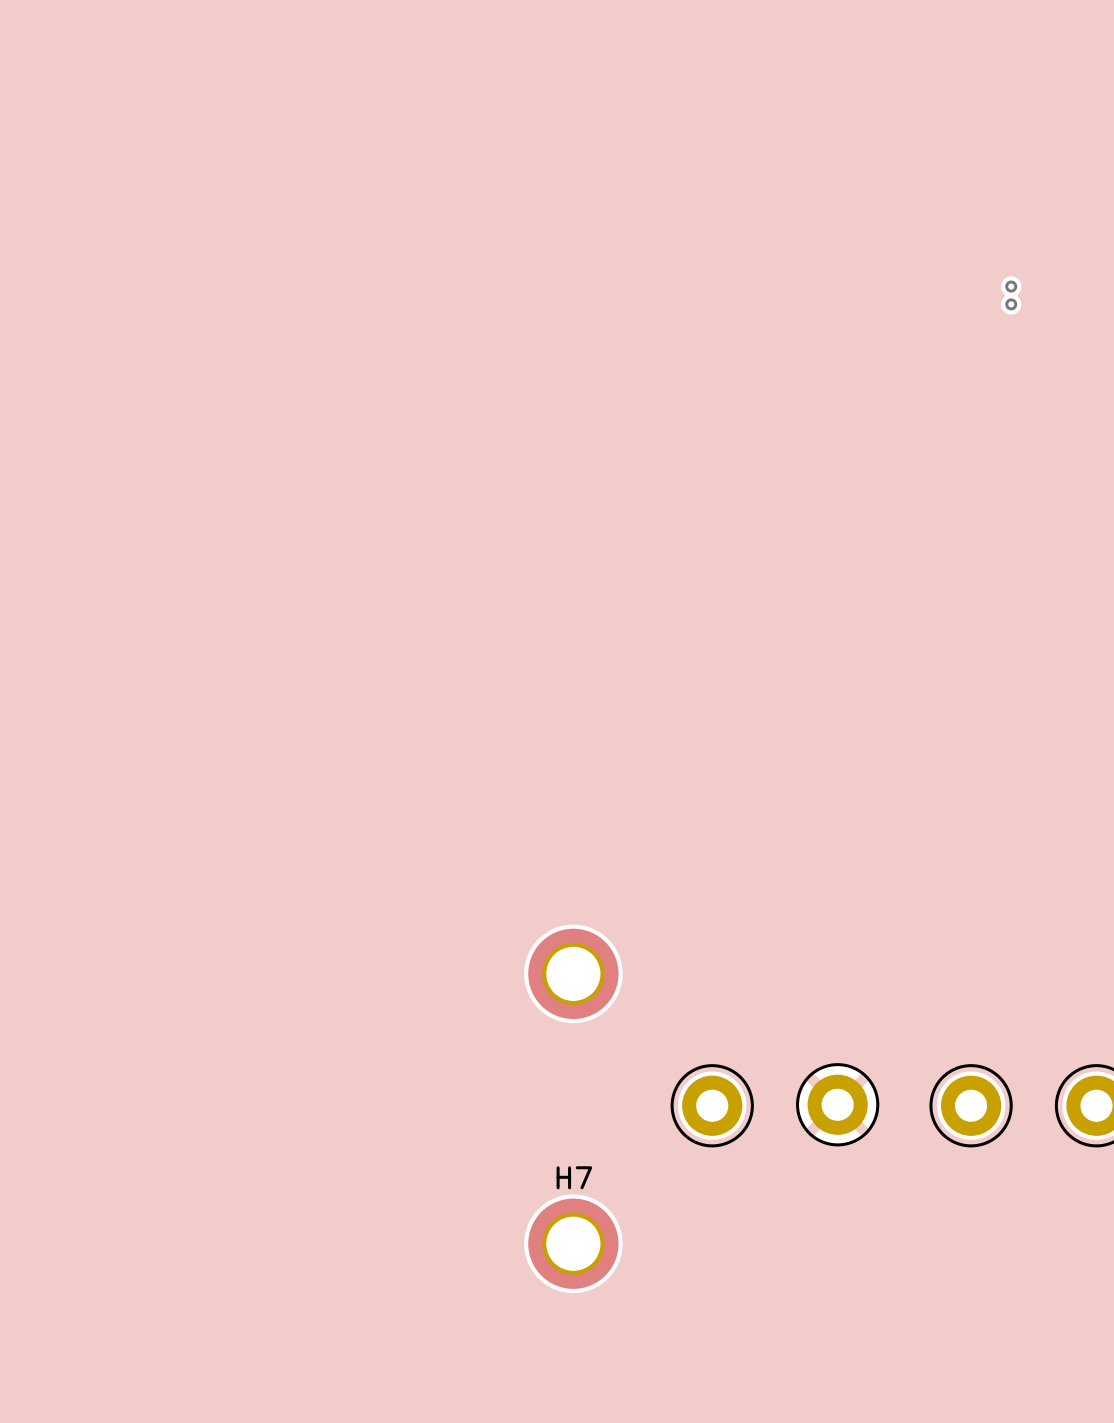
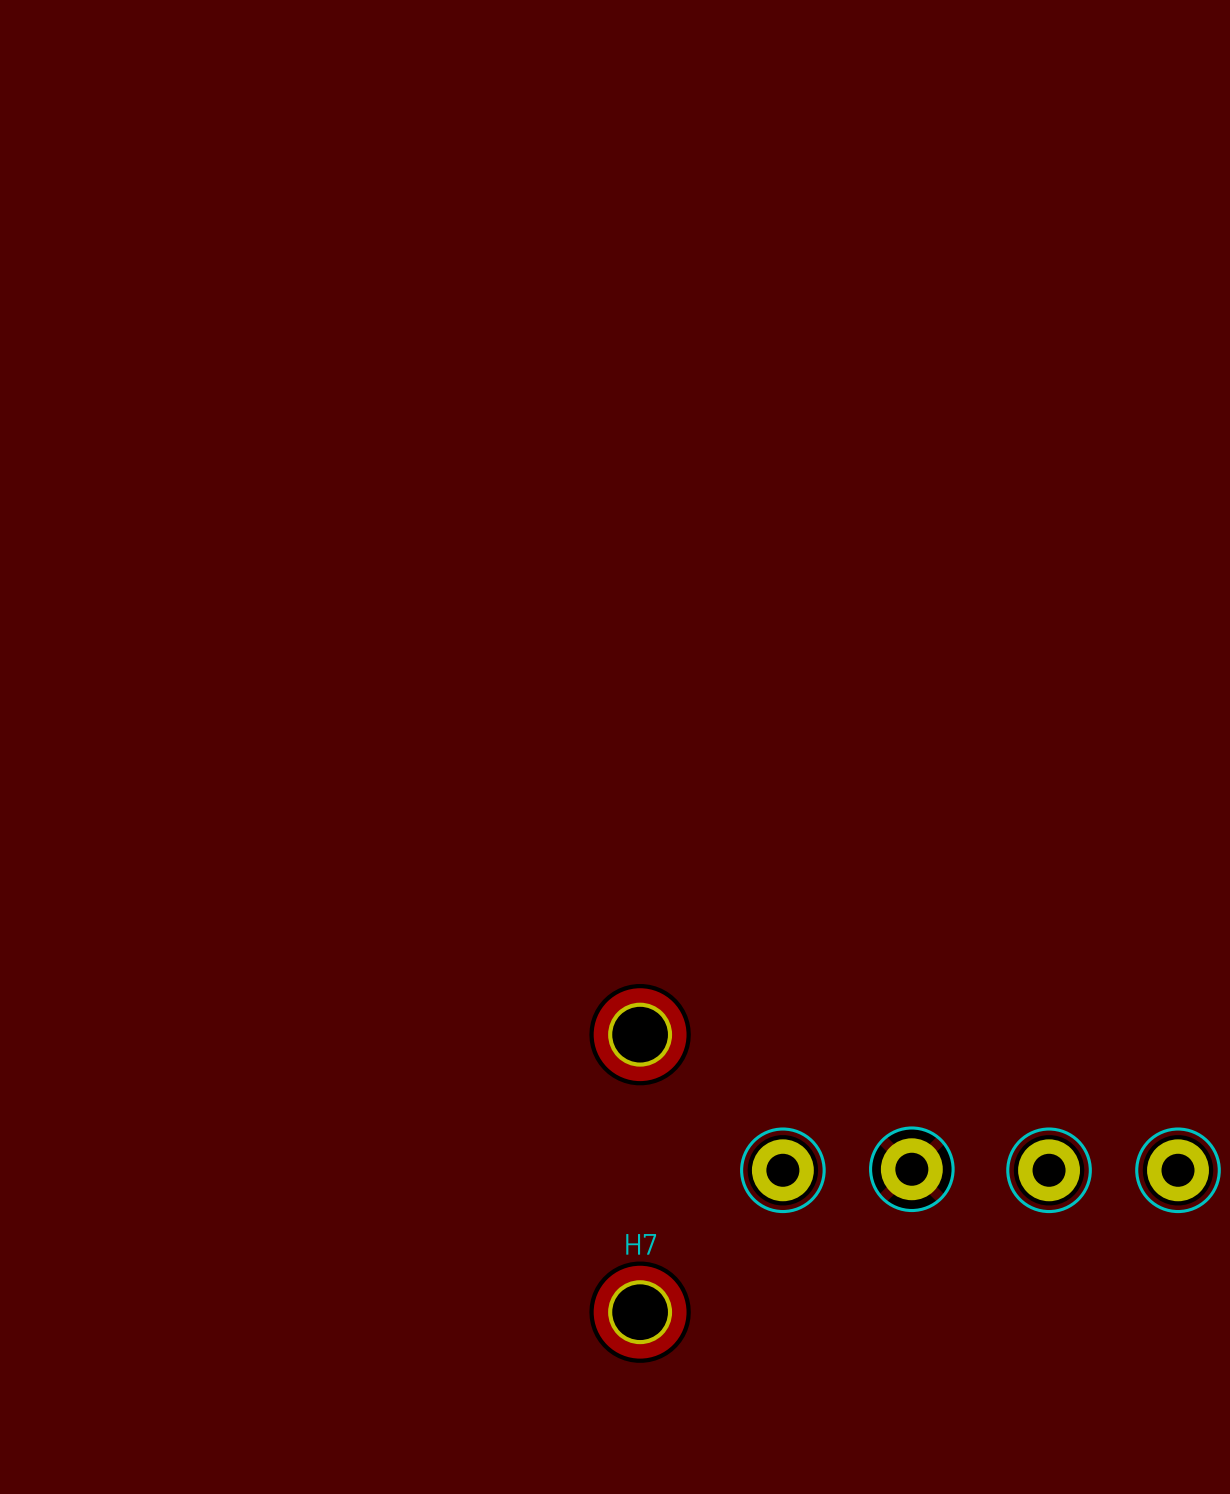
via: (1011, 286) -> none
via: (1011, 304) -> none

